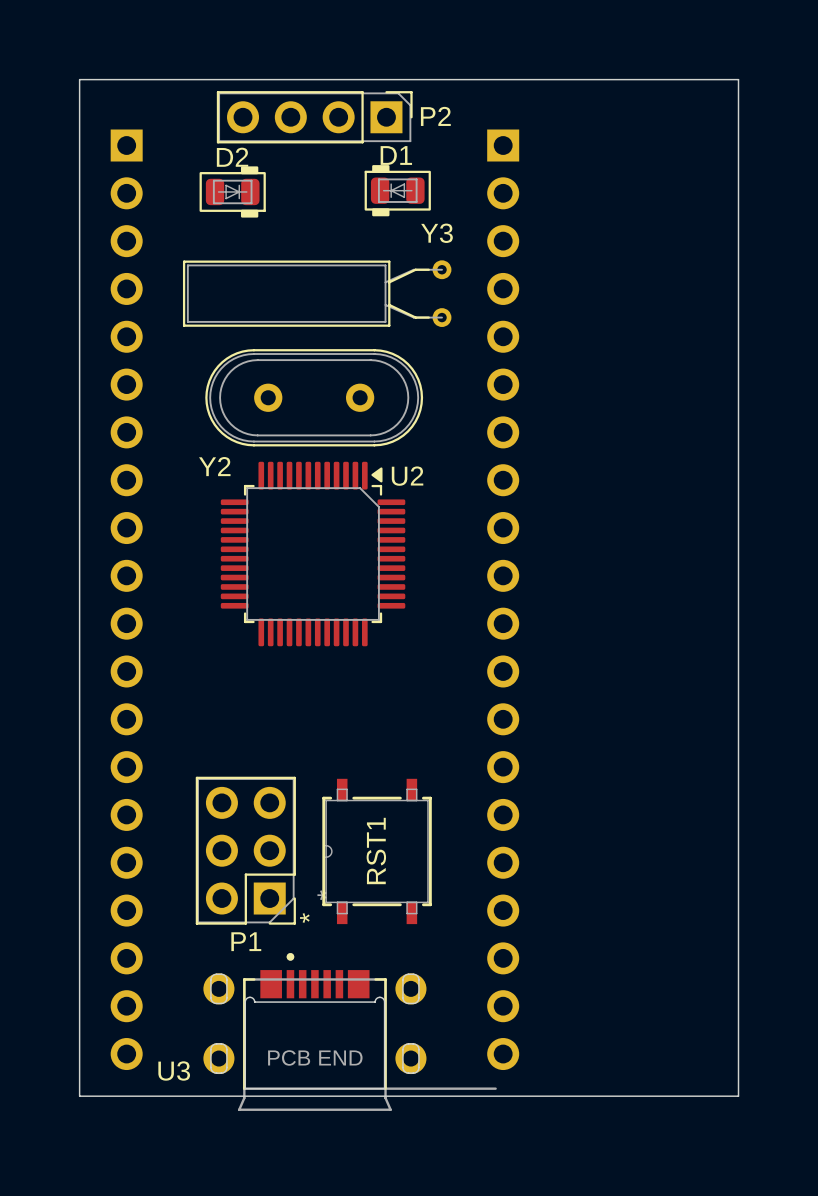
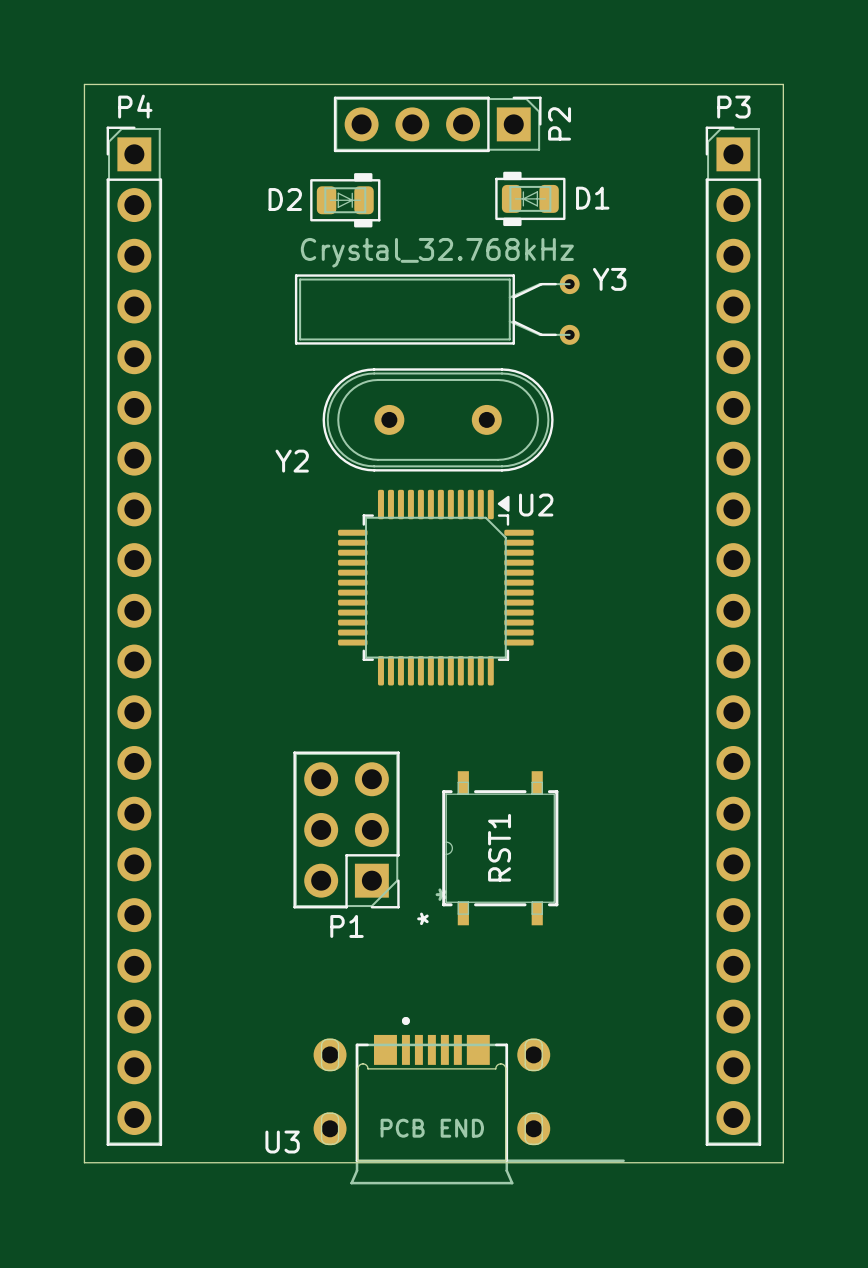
P2 name rotation: 0° (435, 116) -> 90° counterclockwise (559, 123)
P2 position: (314, 117) -> (437, 124)
D1 name position: D1 (396, 155) -> D1 (592, 198)
D2 name position: D2 (232, 157) -> D2 (285, 199)
D1 position: (397, 190) -> (530, 198)
D2 position: (232, 191) -> (345, 200)
Y3 name position: Y3 (437, 233) -> Y3 (609, 279)
Y3 value: none -> Crystal_32.768kHz (437, 252)
Y3 position: (317, 293) -> (437, 309)
Y2 position: (314, 397) -> (438, 419)
Y2 name position: Y2 (214, 466) -> Y2 (292, 461)
U2 position: (313, 554) -> (435, 587)
P4 side: bottom (126, 599) -> top (134, 636)
P3 side: bottom (503, 599) -> top (733, 636)
P1 position: (245, 850) -> (346, 829)
RST1 position: (377, 851) -> (500, 848)
U3 position: (350, 1032) -> (469, 1100)

